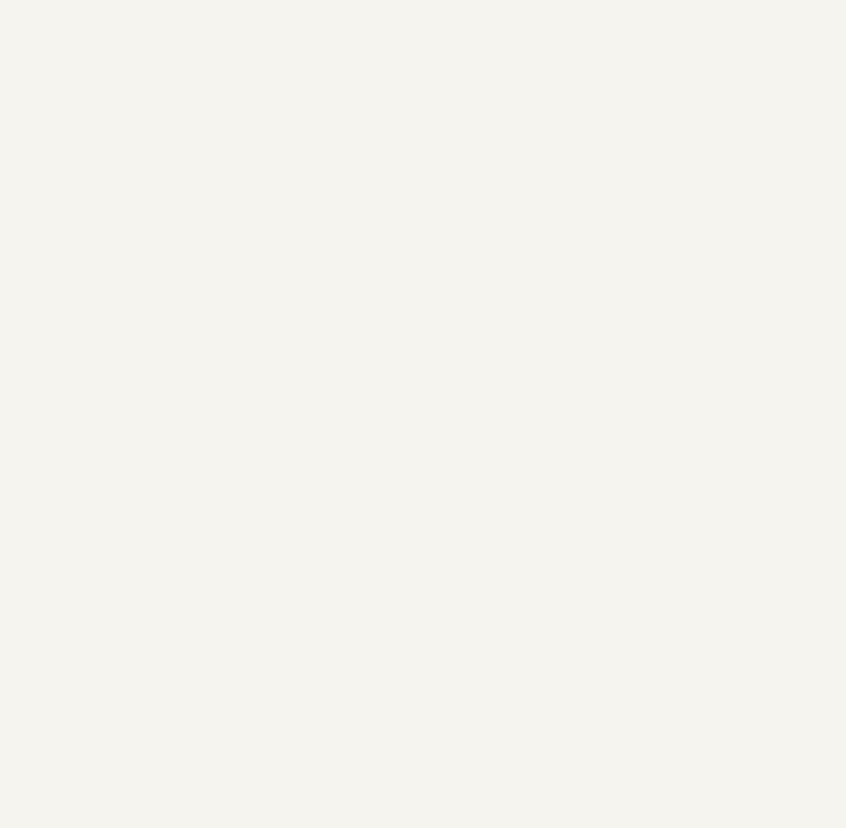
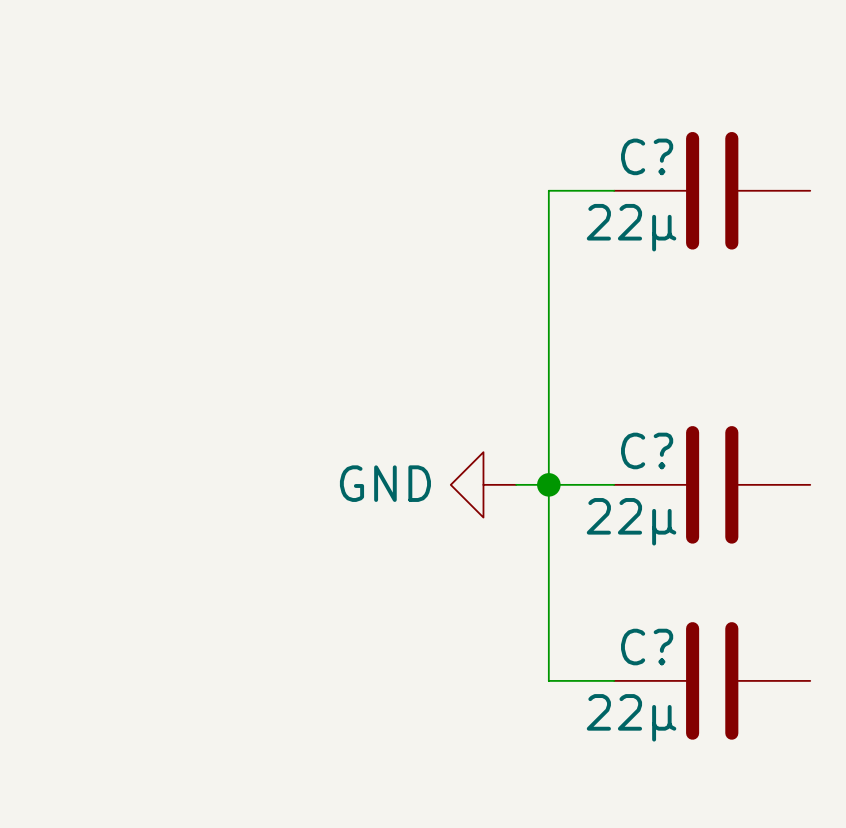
wire: none -> (614, 190) (548, 190) (548, 680) (614, 680)
C?: none -> 22µ (712, 190)
power symbol: none -> GND (483, 484)
wire: none -> (516, 484) (614, 484)
junction: none -> (548, 484)
C?: none -> 22µ (712, 484)
C?: none -> 22µ (712, 680)

